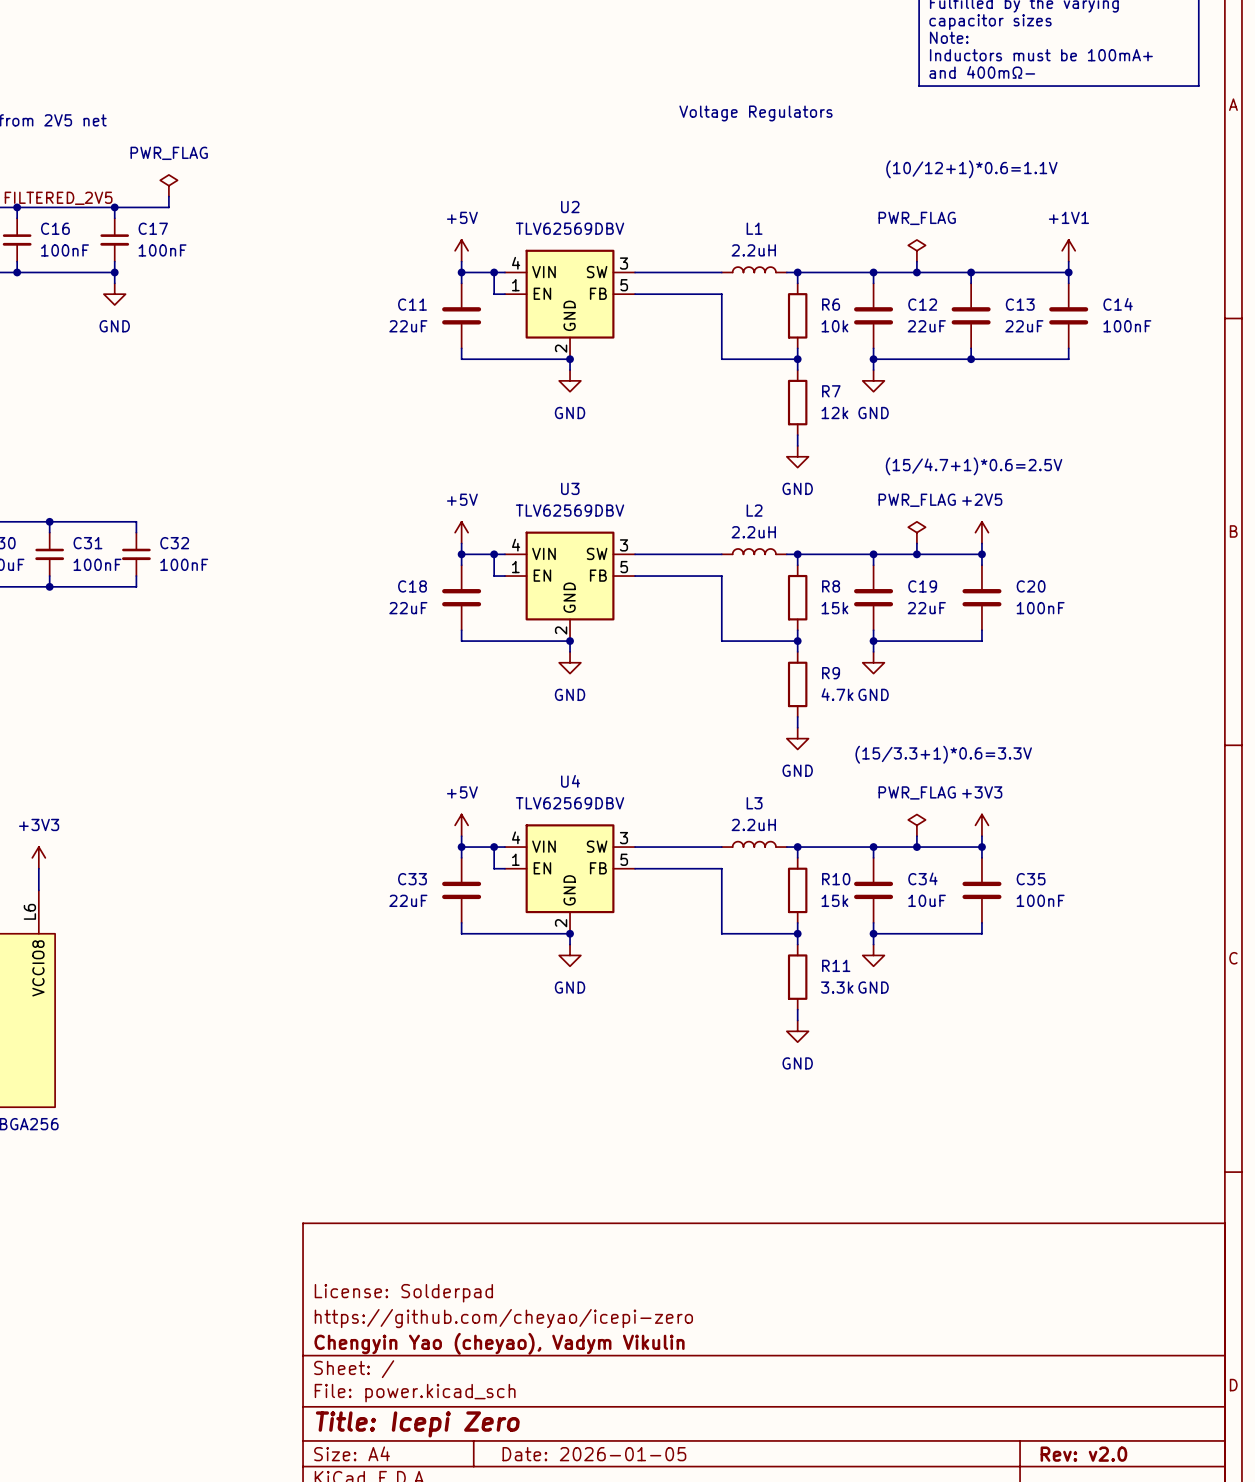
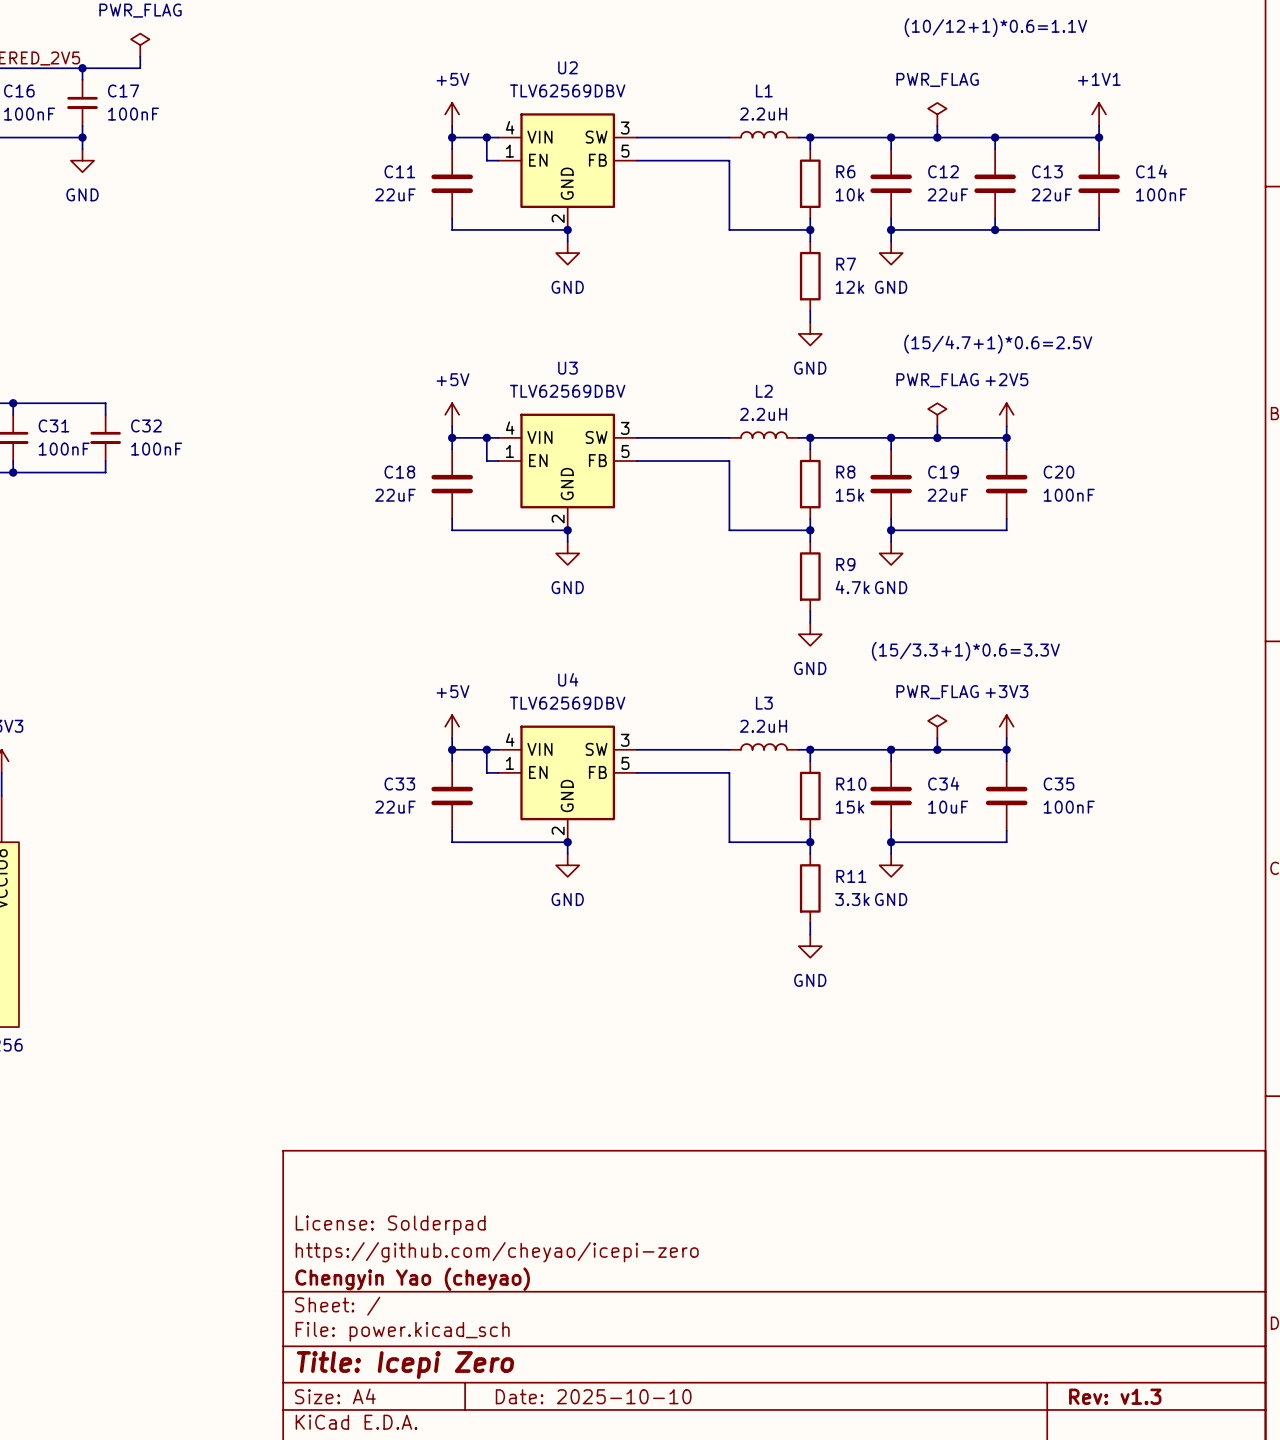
title block: Chengyin Yao (cheyao), Vadym Vikulin (499, 1343) -> Chengyin Yao (cheyao) (412, 1279)
title block: Date: 2026-01-05 (594, 1454) -> Date: 2025-10-10 (593, 1396)
title block: Rev: v2.0 (1083, 1454) -> Rev: v1.3 (1115, 1396)

